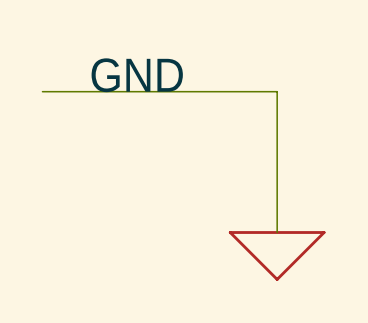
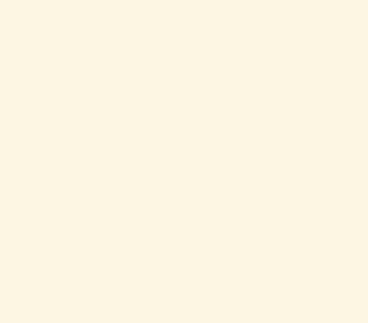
label: GND (137, 75) -> none
wire: (42, 91) (277, 91) (277, 232) -> none
power symbol: (277, 255) -> none

